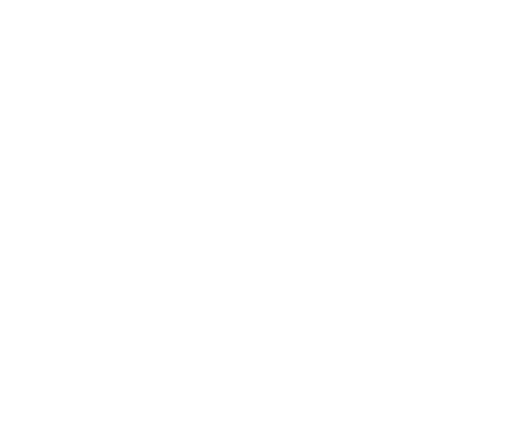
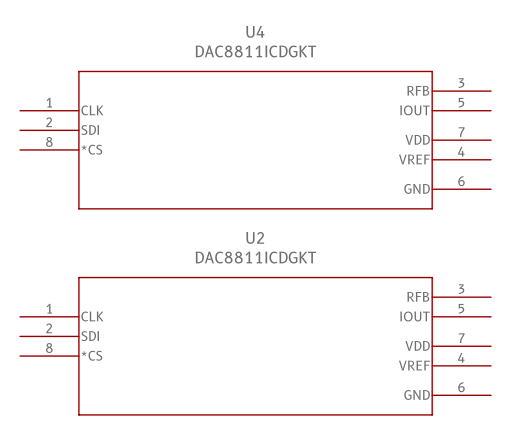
U4: none -> DAC8811ICDGKT (255, 140)
U2: none -> DAC8811ICDGKT (255, 346)

